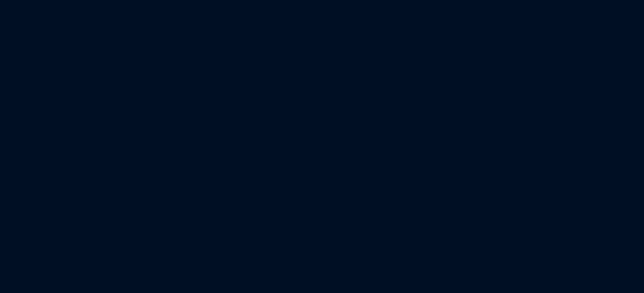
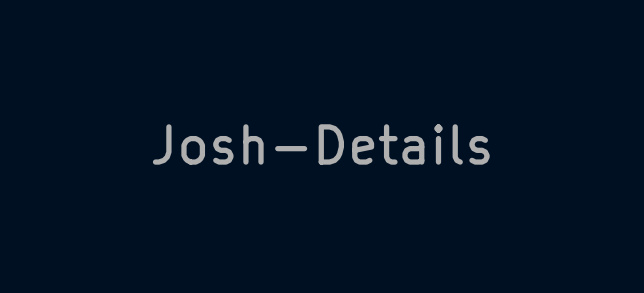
drawing: none -> [152, 124, 490, 165]

